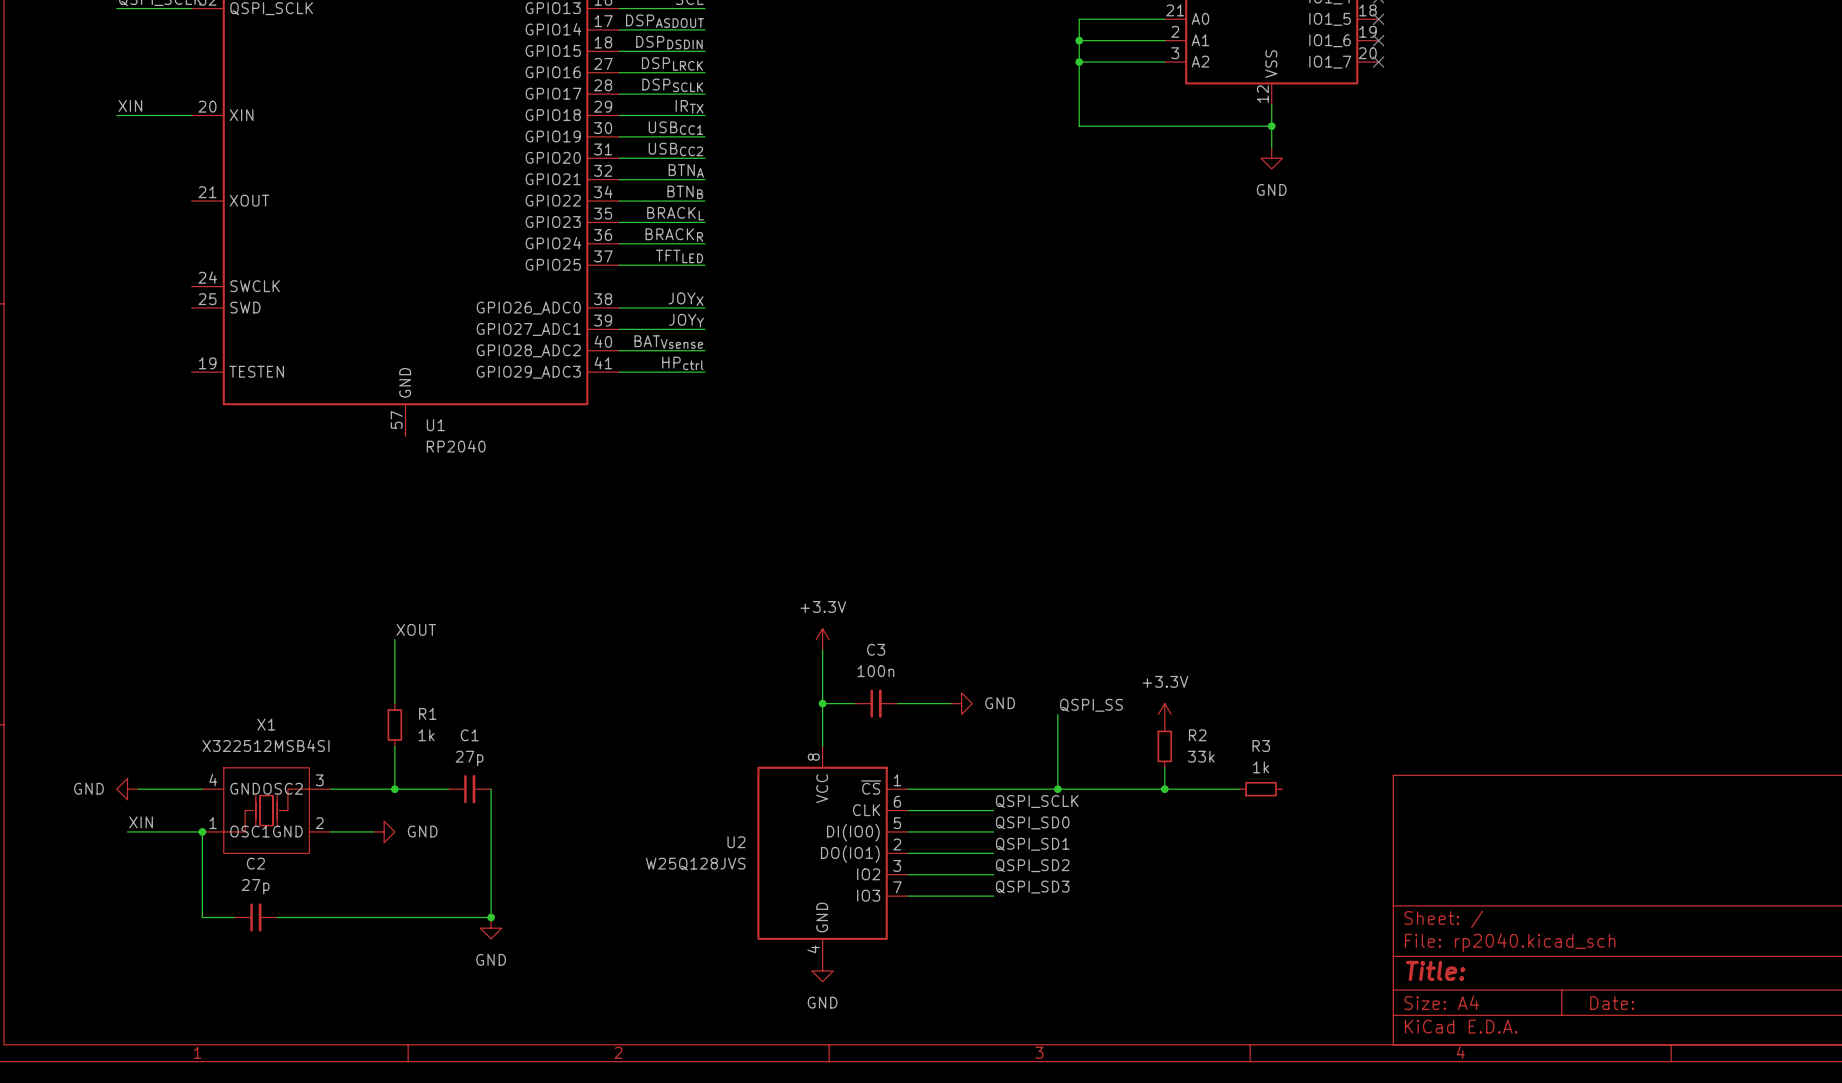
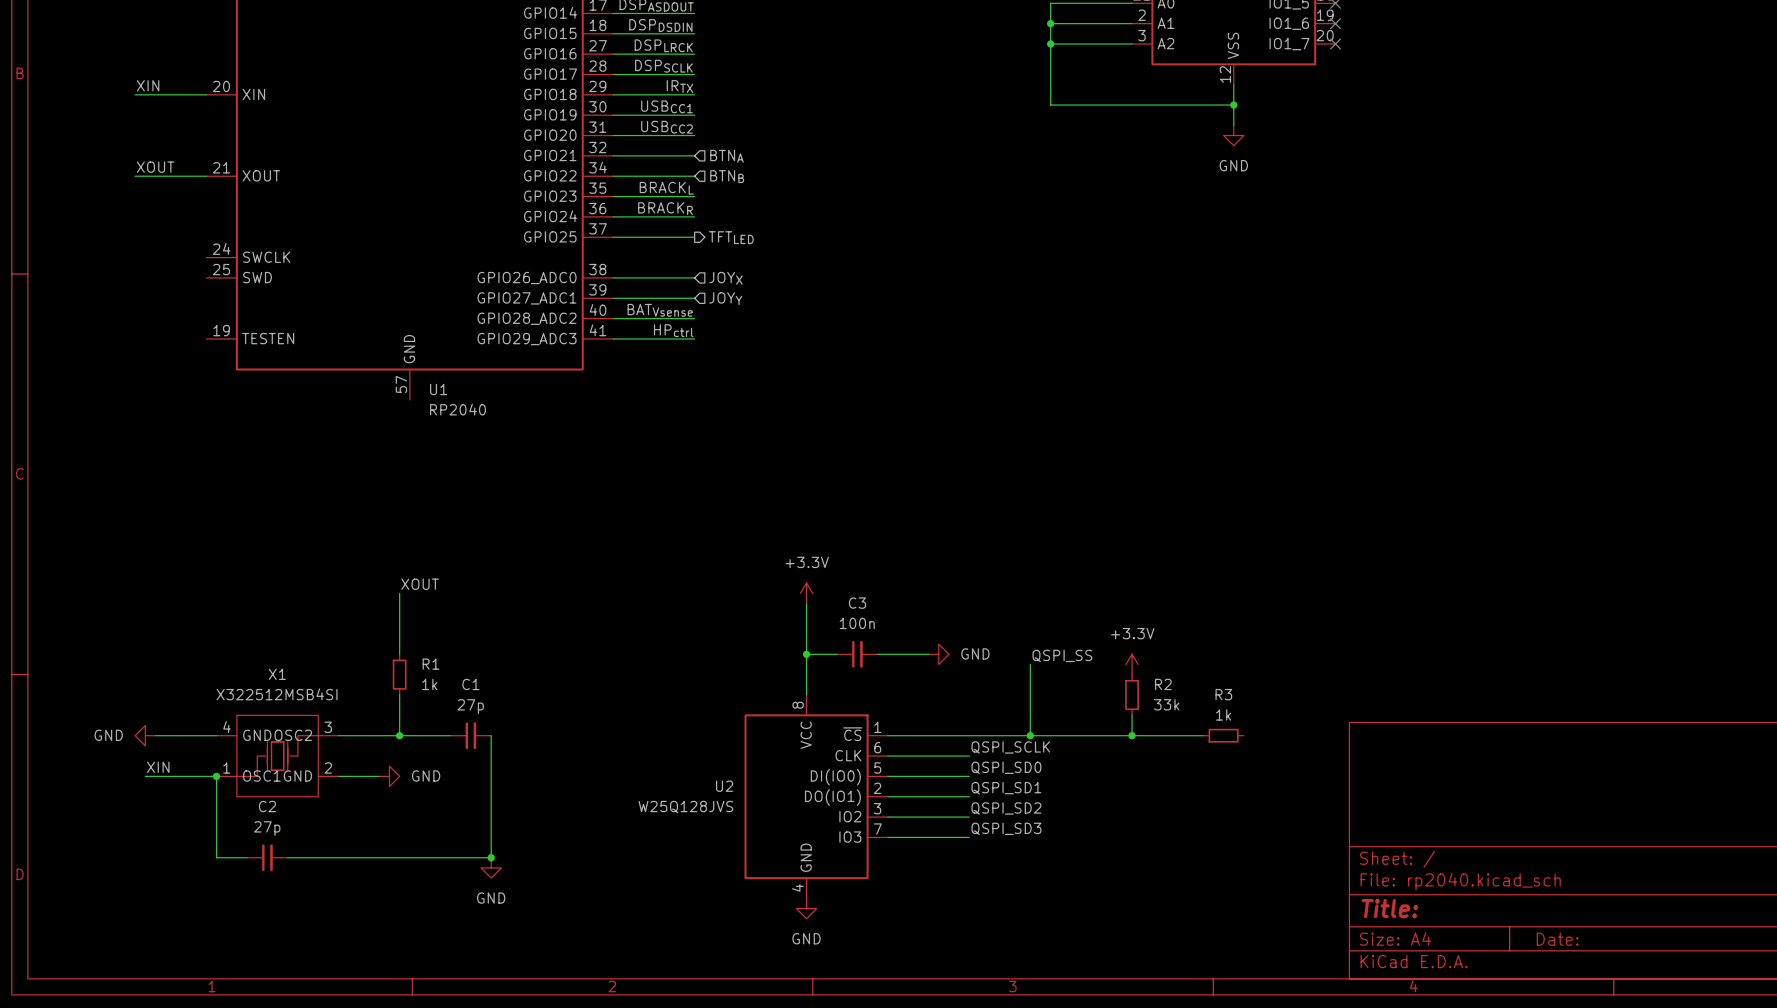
label: BTNA (686, 170) -> none
hierarchical label: none -> BTNA (726, 156)
label: none -> XOUT (155, 167)
label: BTNB (685, 192) -> none
wire: none -> (135, 176) (206, 176)
hierarchical label: none -> BTNB (727, 176)
label: TFTLED (679, 256) -> none
hierarchical label: none -> TFTLED (731, 237)
label: JOYX (685, 299) -> none
hierarchical label: none -> JOYX (725, 278)
label: JOYY (686, 320) -> none
hierarchical label: none -> JOYY (725, 298)

